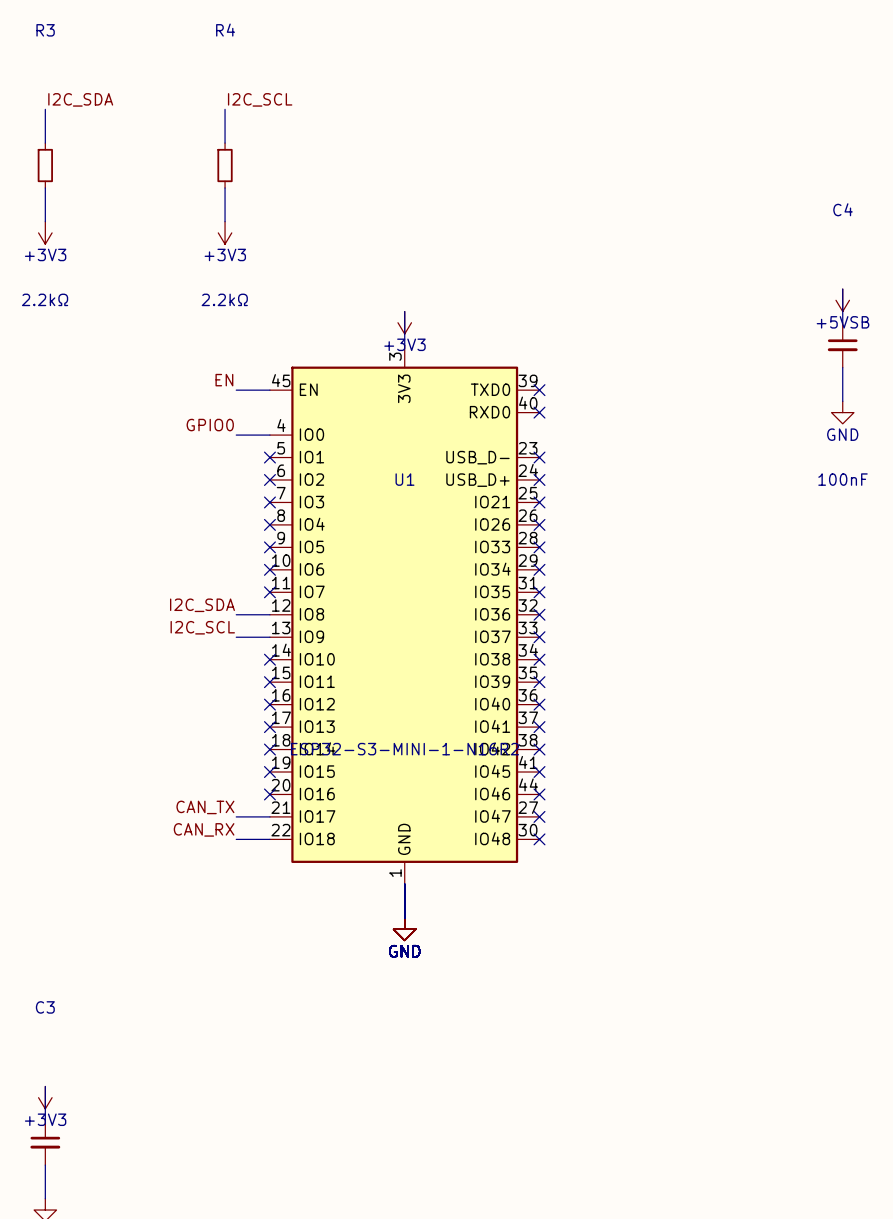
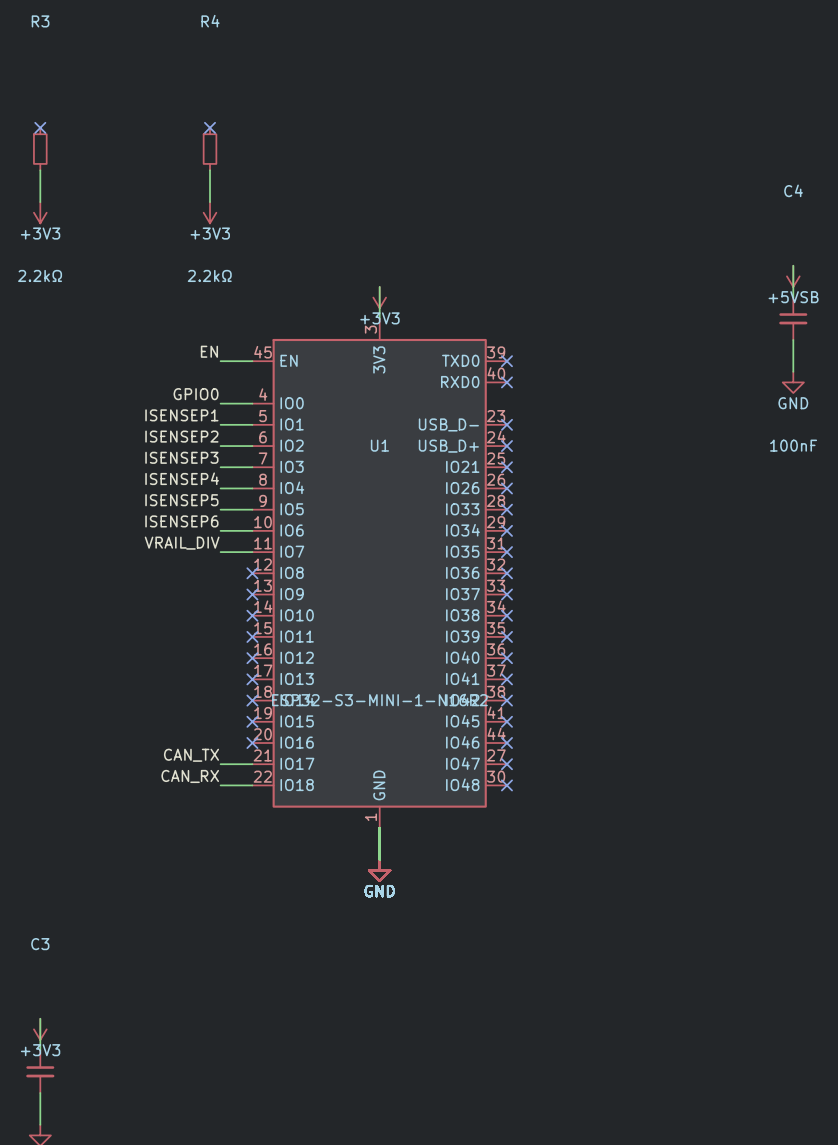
label: I2C_SDA (80, 99) -> none
label: I2C_SCL (260, 99) -> none
wire: (45, 109) (45, 143) -> none
wire: (225, 109) (225, 143) -> none
no-connect mark: none -> (40, 127)
no-connect mark: none -> (210, 127)
label: none -> ISENSEP1 (181, 415)
wire: none -> (220, 424) (252, 424)
no-connect mark: (269, 457) -> none
label: none -> ISENSEP2 (181, 436)
wire: none -> (220, 446) (252, 446)
no-connect mark: (269, 479) -> none
label: none -> ISENSEP3 (181, 457)
wire: none -> (220, 467) (252, 467)
no-connect mark: (269, 502) -> none
label: none -> ISENSEP4 (182, 478)
wire: none -> (220, 488) (252, 488)
no-connect mark: (269, 524) -> none
label: none -> ISENSEP5 (181, 500)
wire: none -> (220, 509) (252, 509)
no-connect mark: (269, 547) -> none
label: none -> ISENSEP6 (181, 521)
no-connect mark: (269, 569) -> none
label: none -> VRAIL_DIV (182, 543)
no-connect mark: (269, 592) -> none
label: I2C_SDA (202, 605) -> none
wire: (236, 614) (269, 614) -> (220, 530) (252, 530)
no-connect mark: none -> (252, 573)
label: I2C_SCL (202, 627) -> none
wire: (236, 637) (269, 637) -> (220, 552) (252, 552)
no-connect mark: none -> (252, 594)

